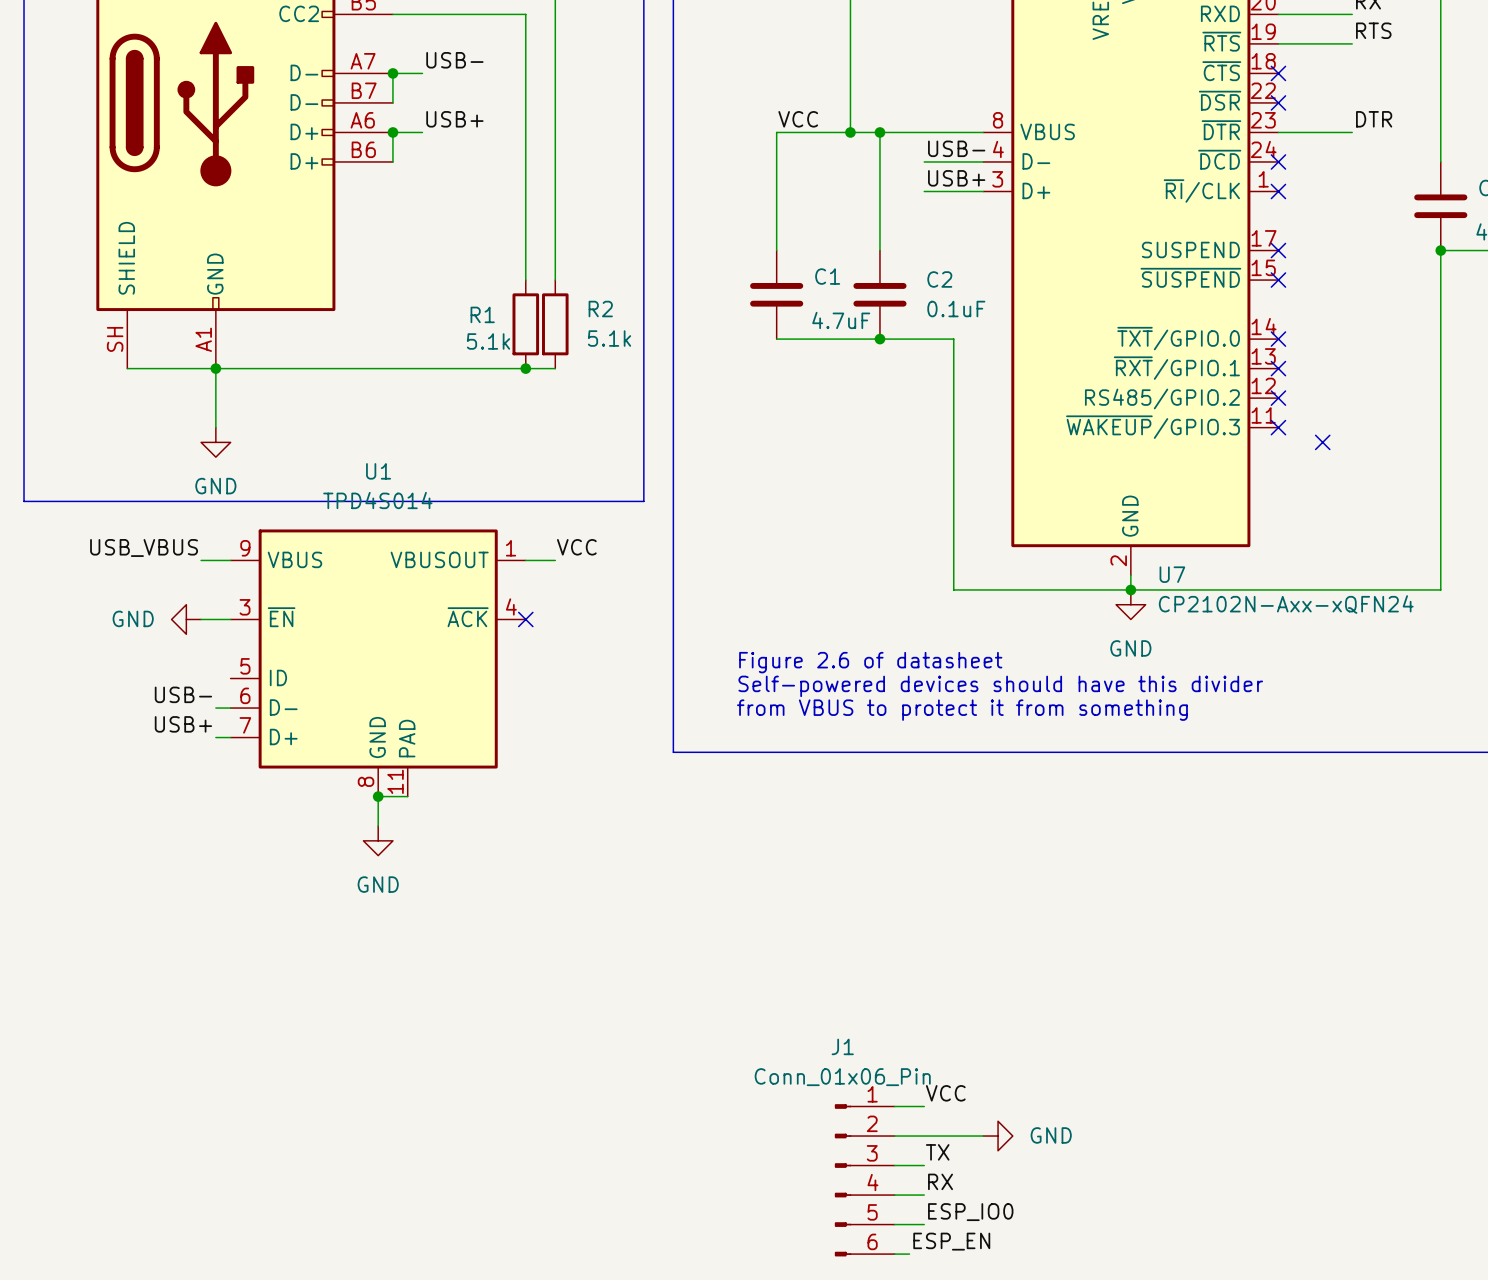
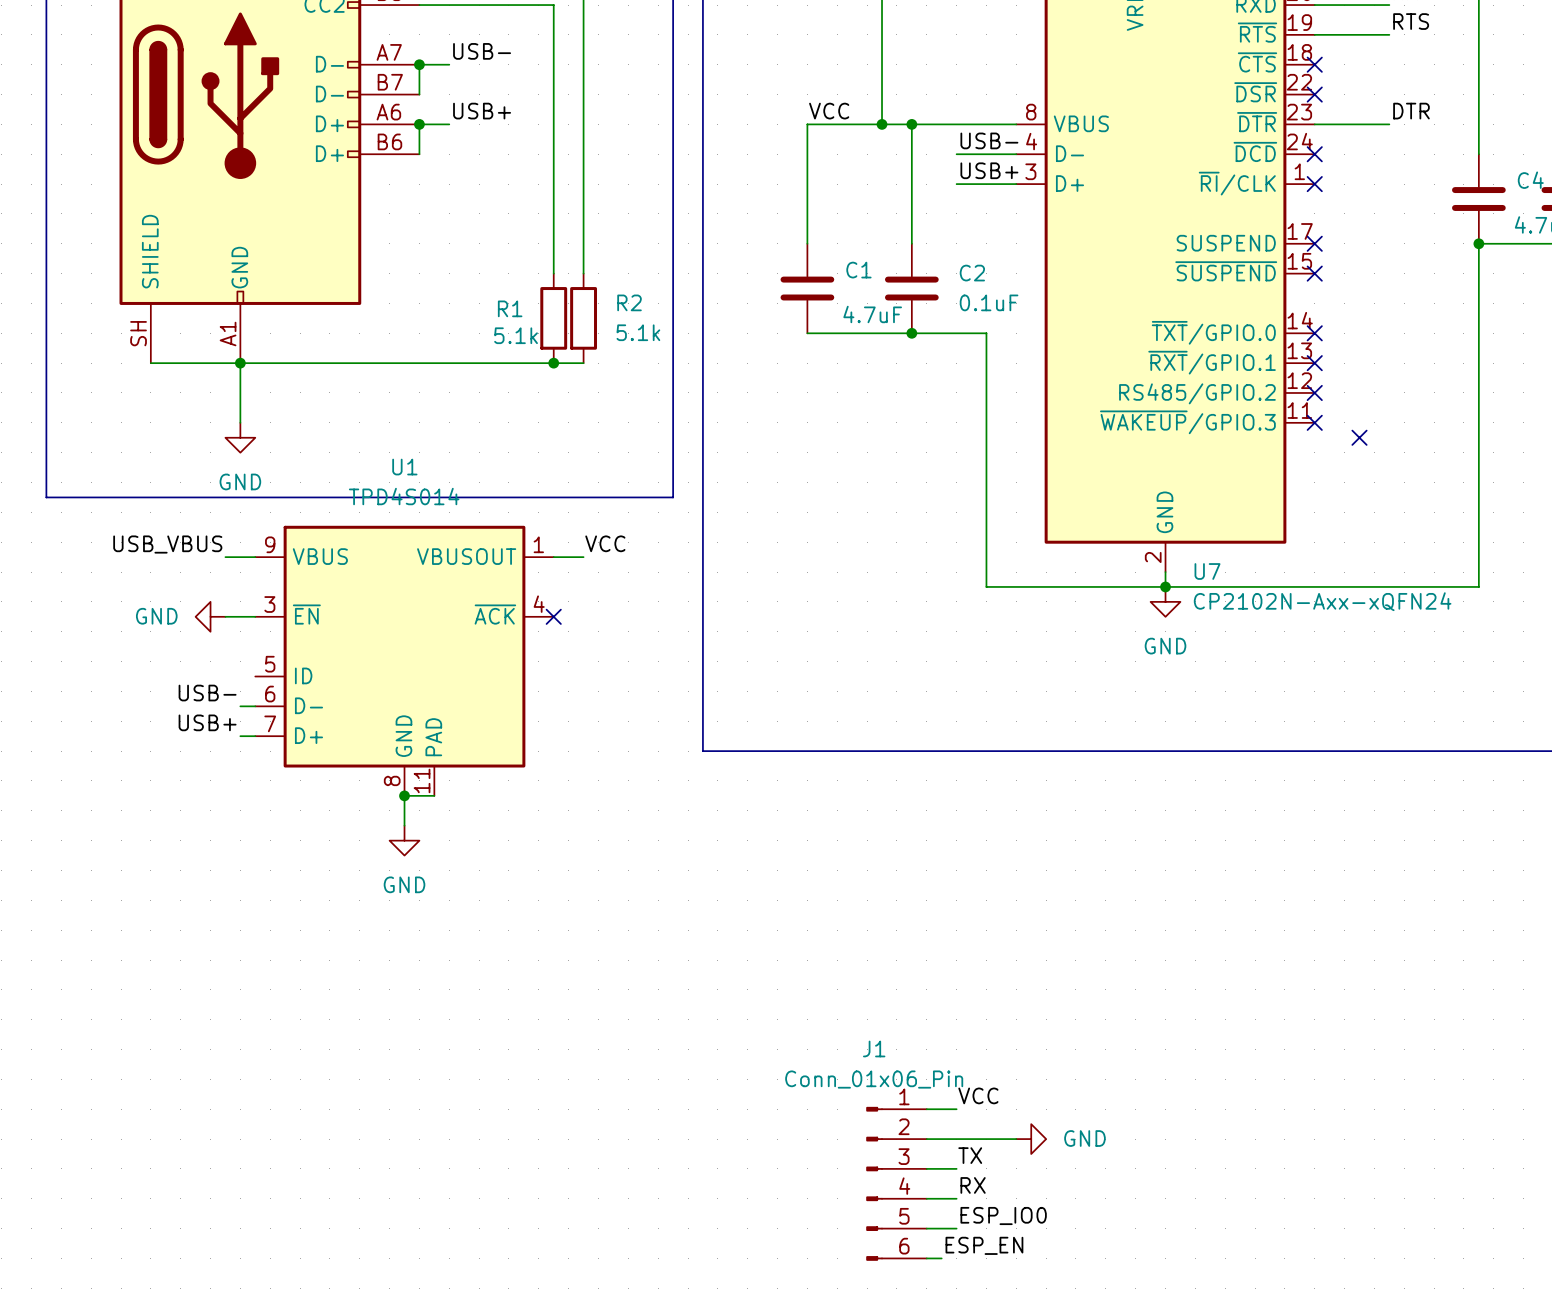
text: Figure 2.6 of datasheet (870, 662) -> none
text: Self-powered devices should have this divider (1000, 686) -> none
text: from VBUS to protect it from something (962, 710) -> none

